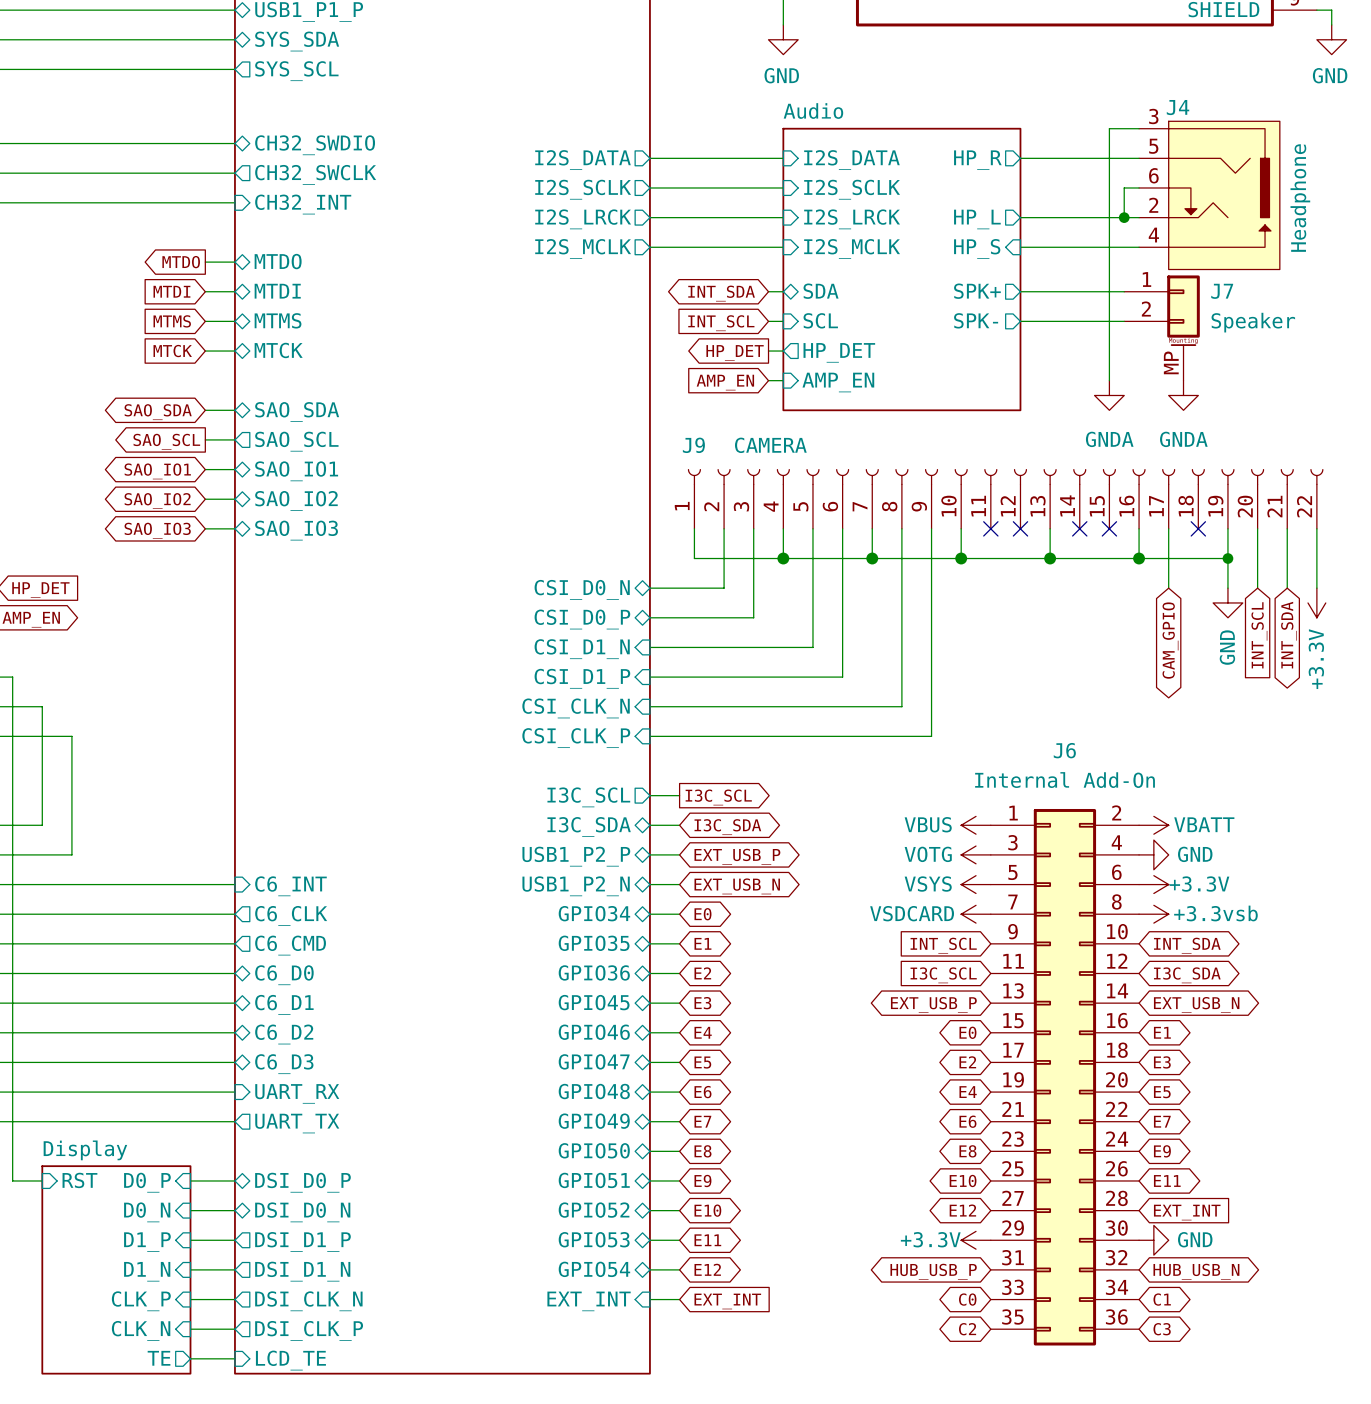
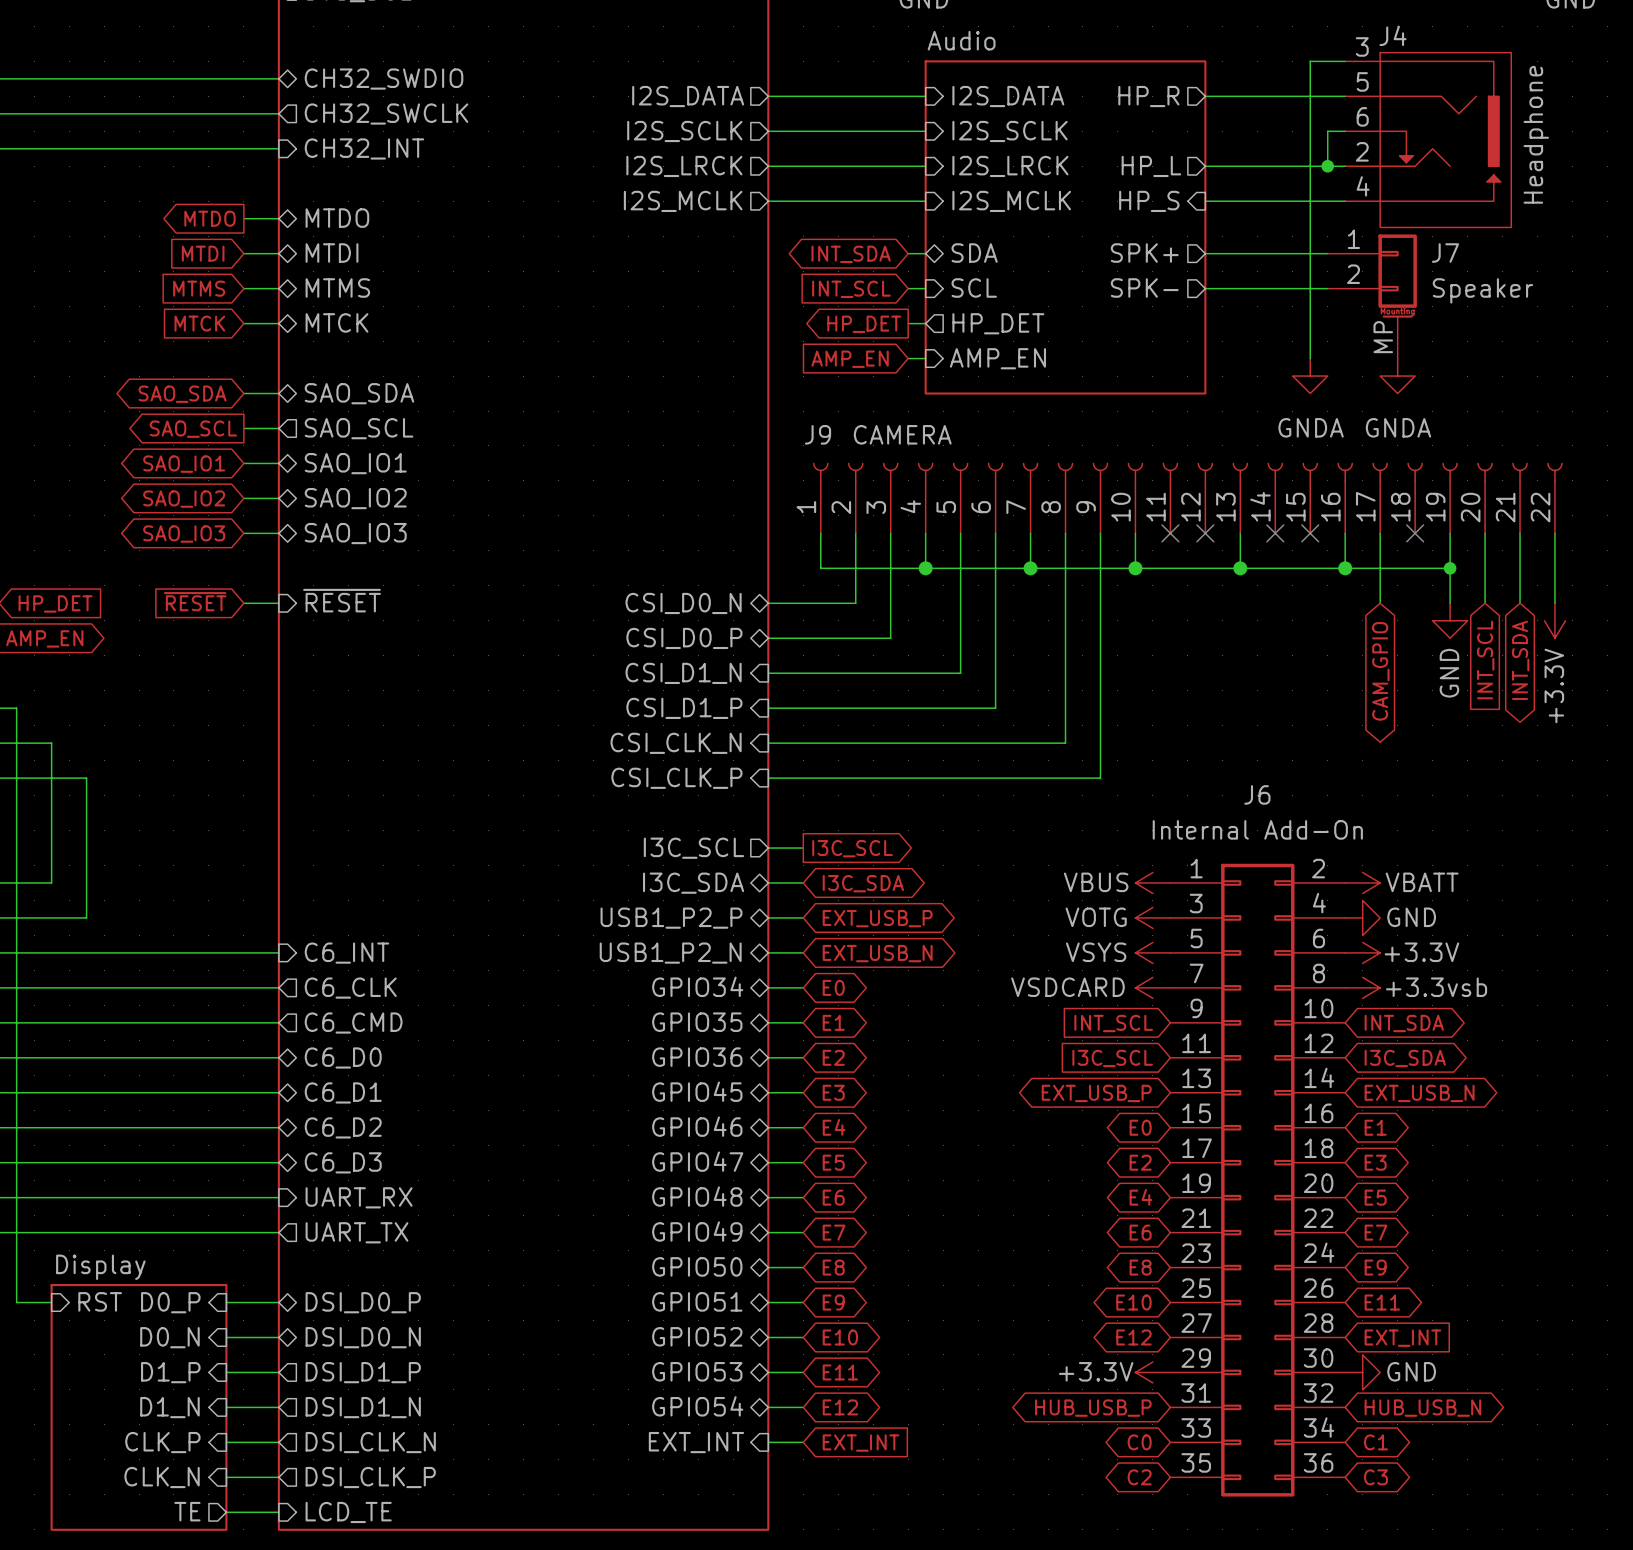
global label: none -> ~{RESET} (195, 601)
sheet pin: none -> ~{RESET} (342, 600)
wire: none -> (243, 603) (278, 603)

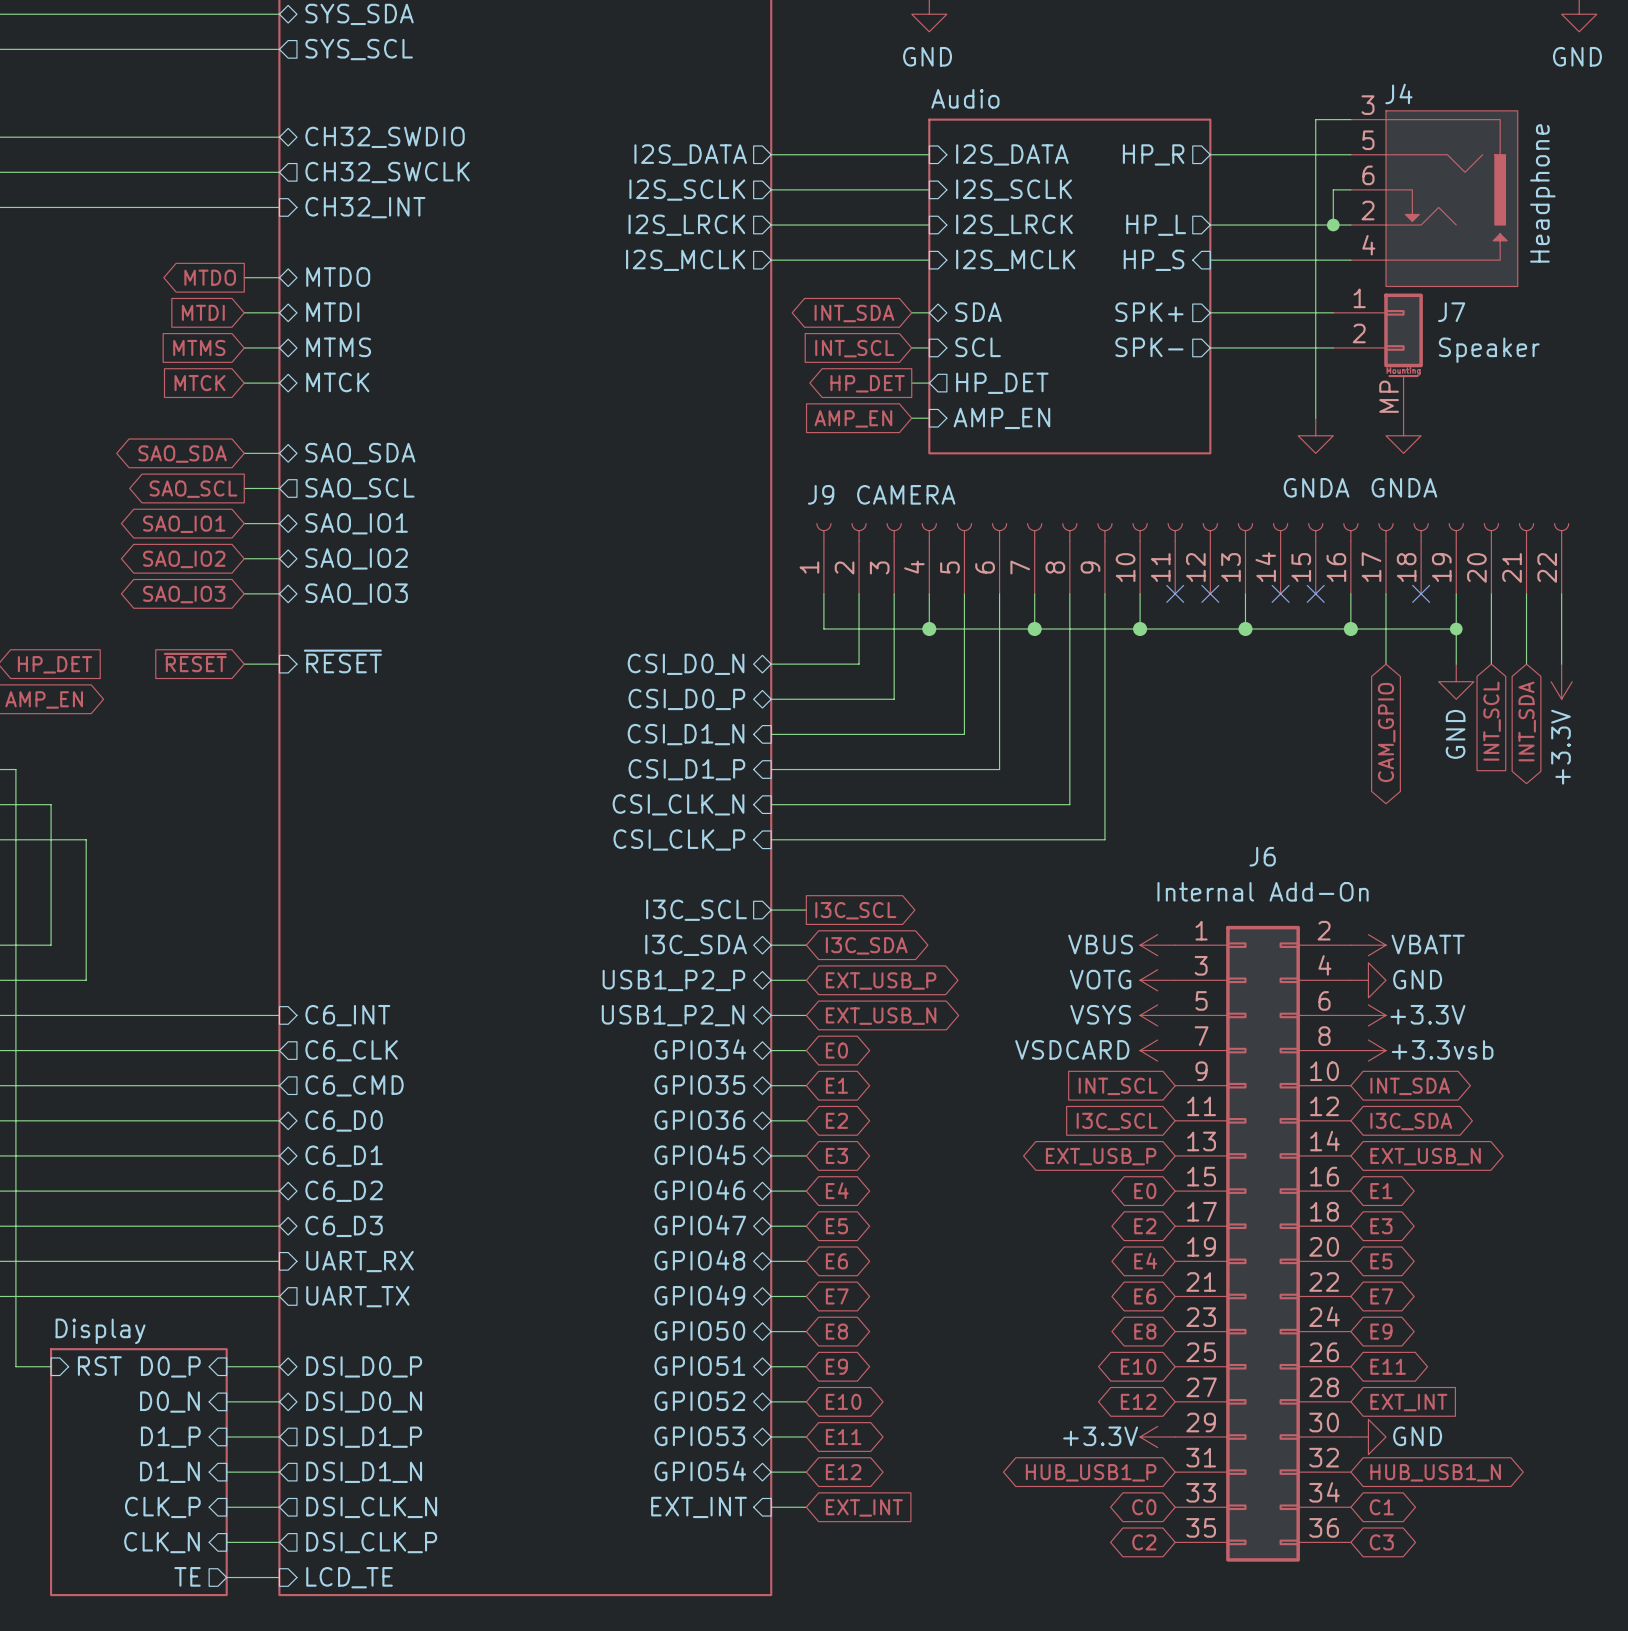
global label: HUB_USB_P (1093, 1408) -> HUB_USB1_P (1091, 1472)
global label: HUB_USB_N (1422, 1408) -> HUB_USB1_N (1435, 1472)

